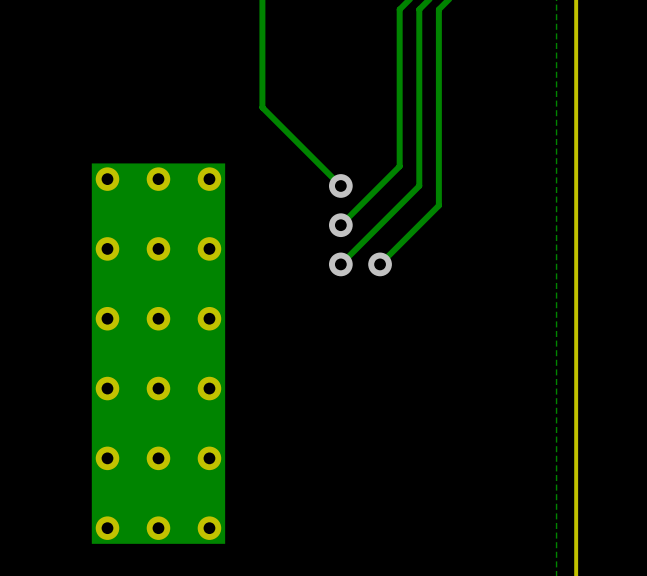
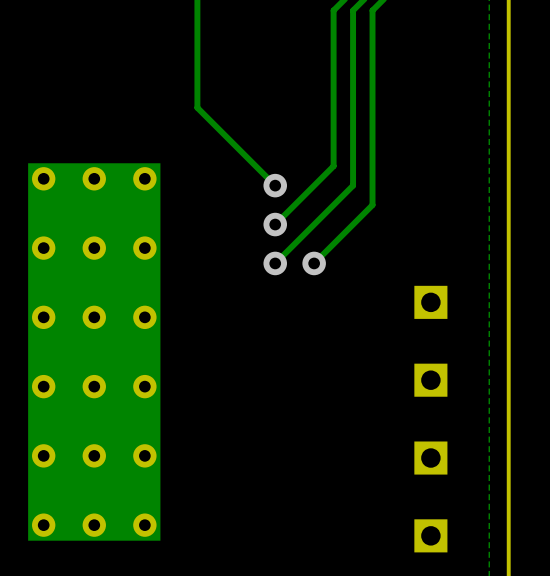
part: none -> (430, 302)
part: none -> (430, 380)
part: none -> (430, 458)
part: none -> (430, 535)

